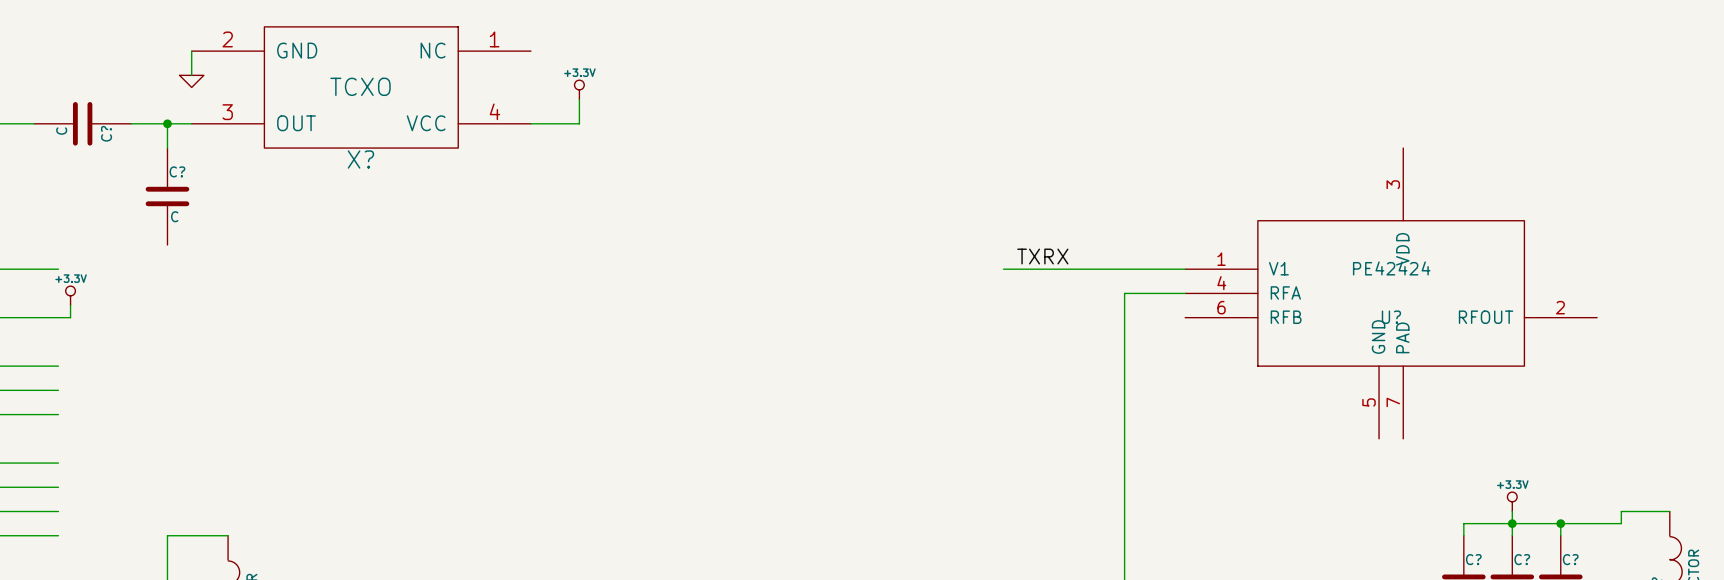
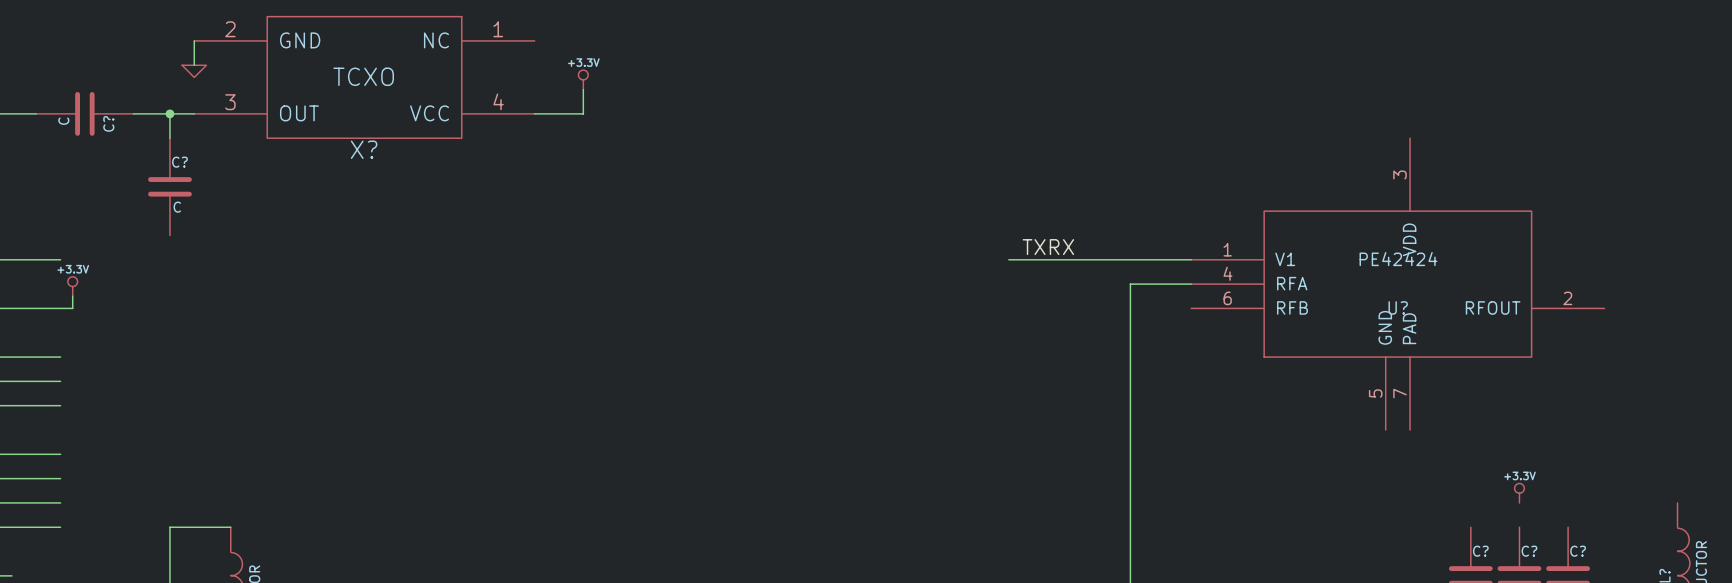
wire: (1512, 511) (1512, 535) -> none
wire: (1669, 511) (1621, 511) (1621, 523) (1463, 523) (1463, 535) -> none
junction: (1512, 523) -> none
wire: (1560, 523) (1560, 535) -> none
junction: (1560, 523) -> none

